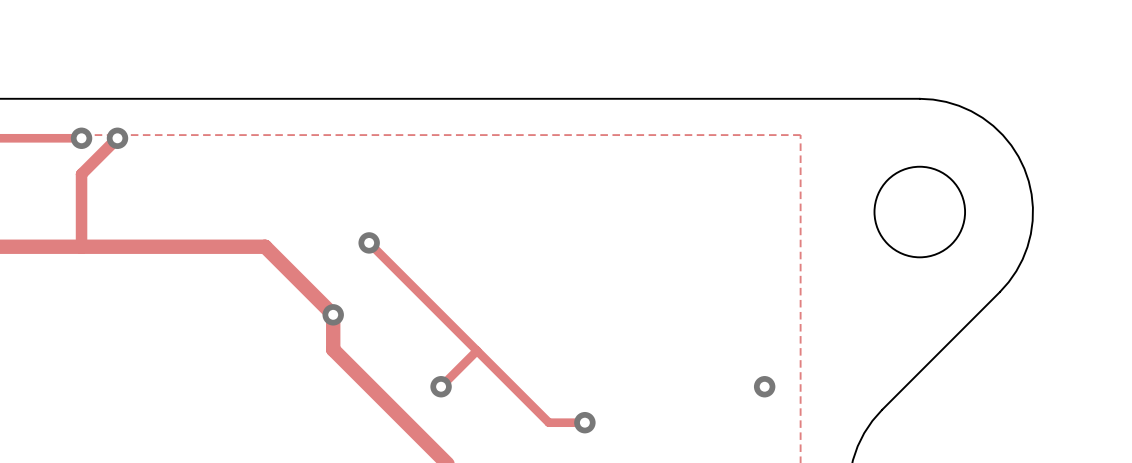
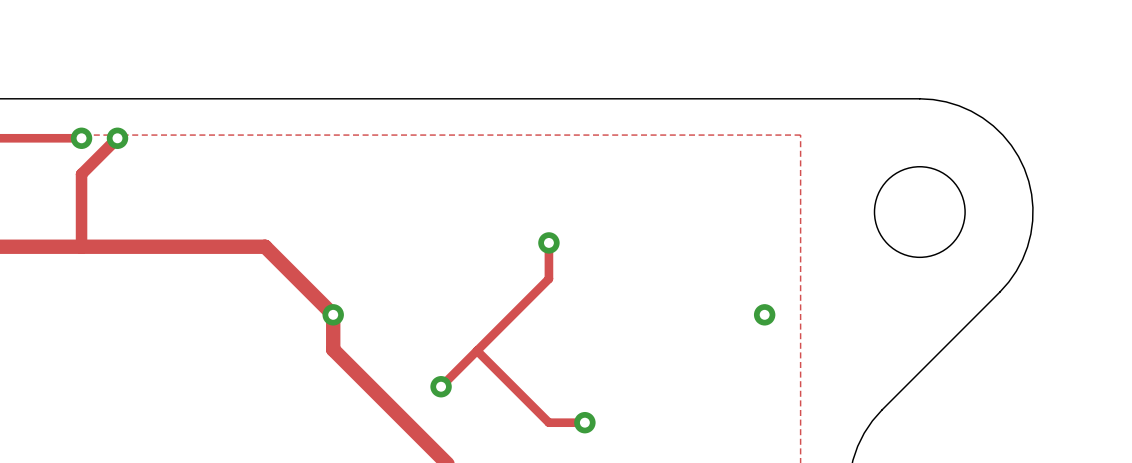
track: (369, 242) (477, 350) -> (548, 242) (548, 278) (477, 350)
via: (369, 242) -> none
via: none -> (548, 242)
via position: (764, 386) -> (764, 314)

